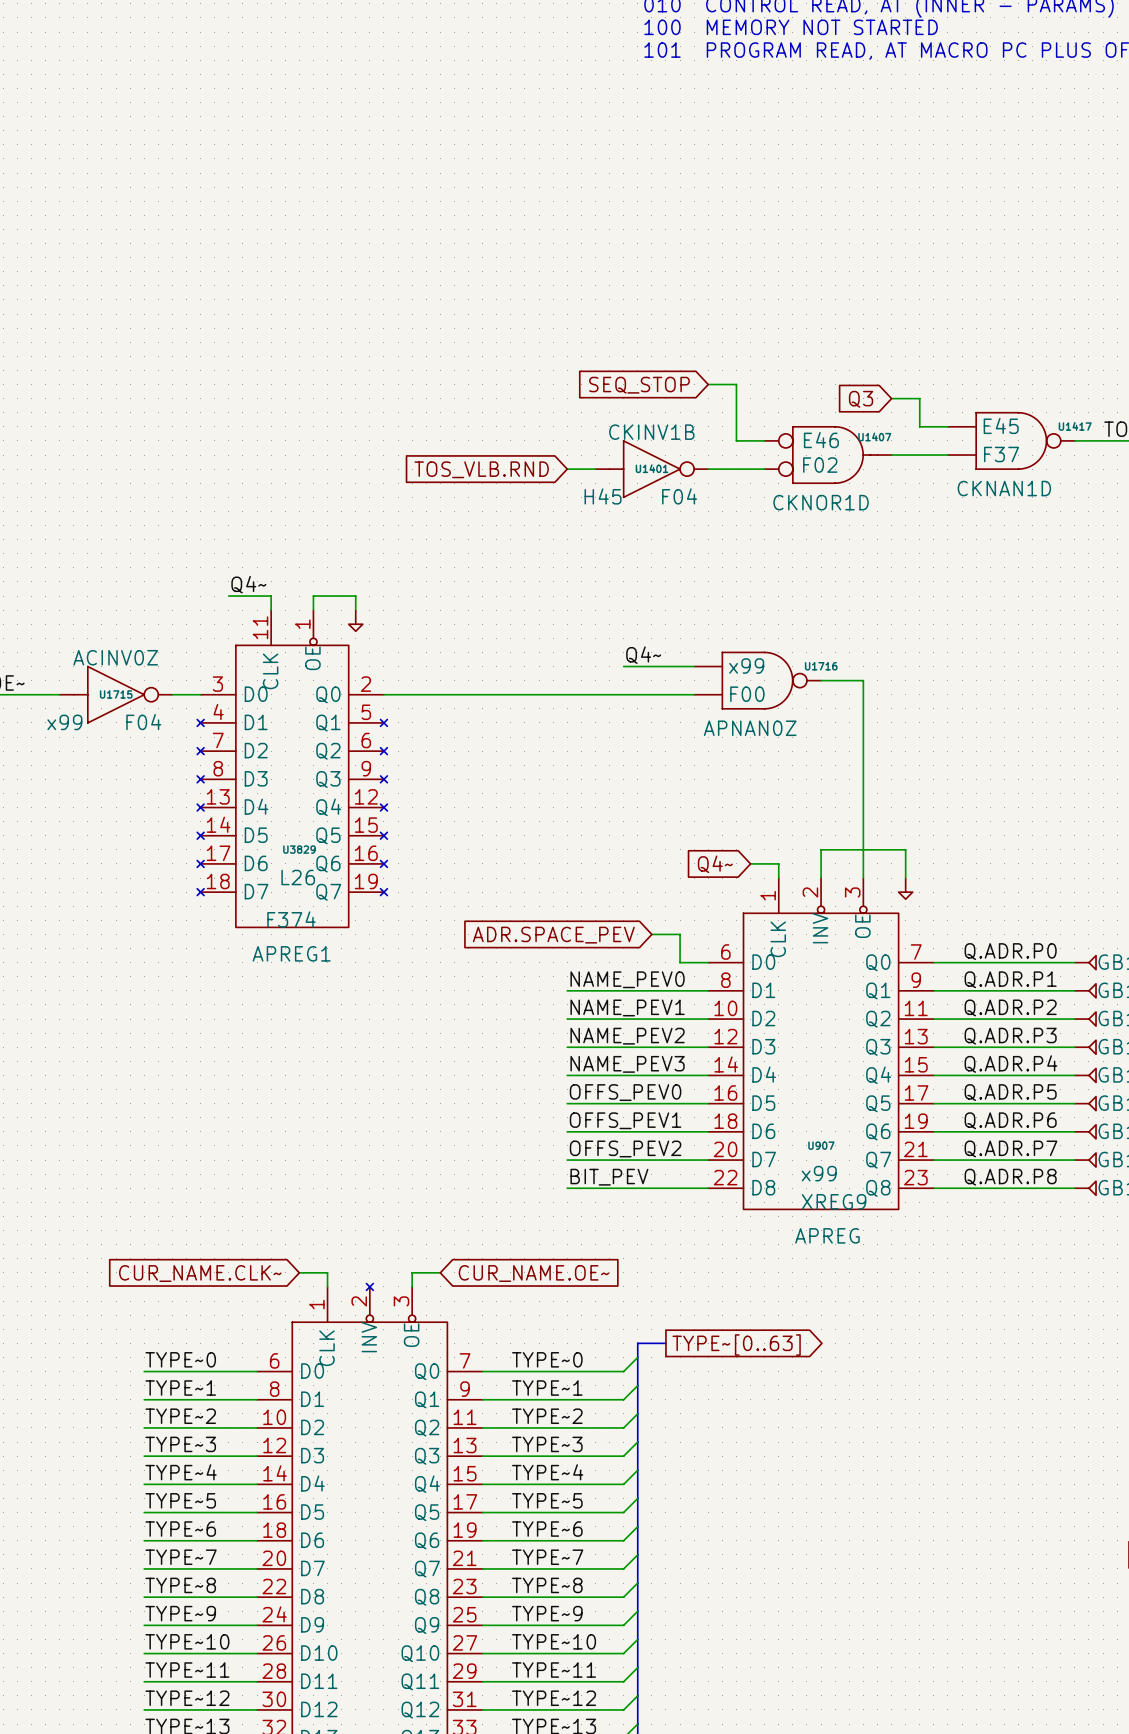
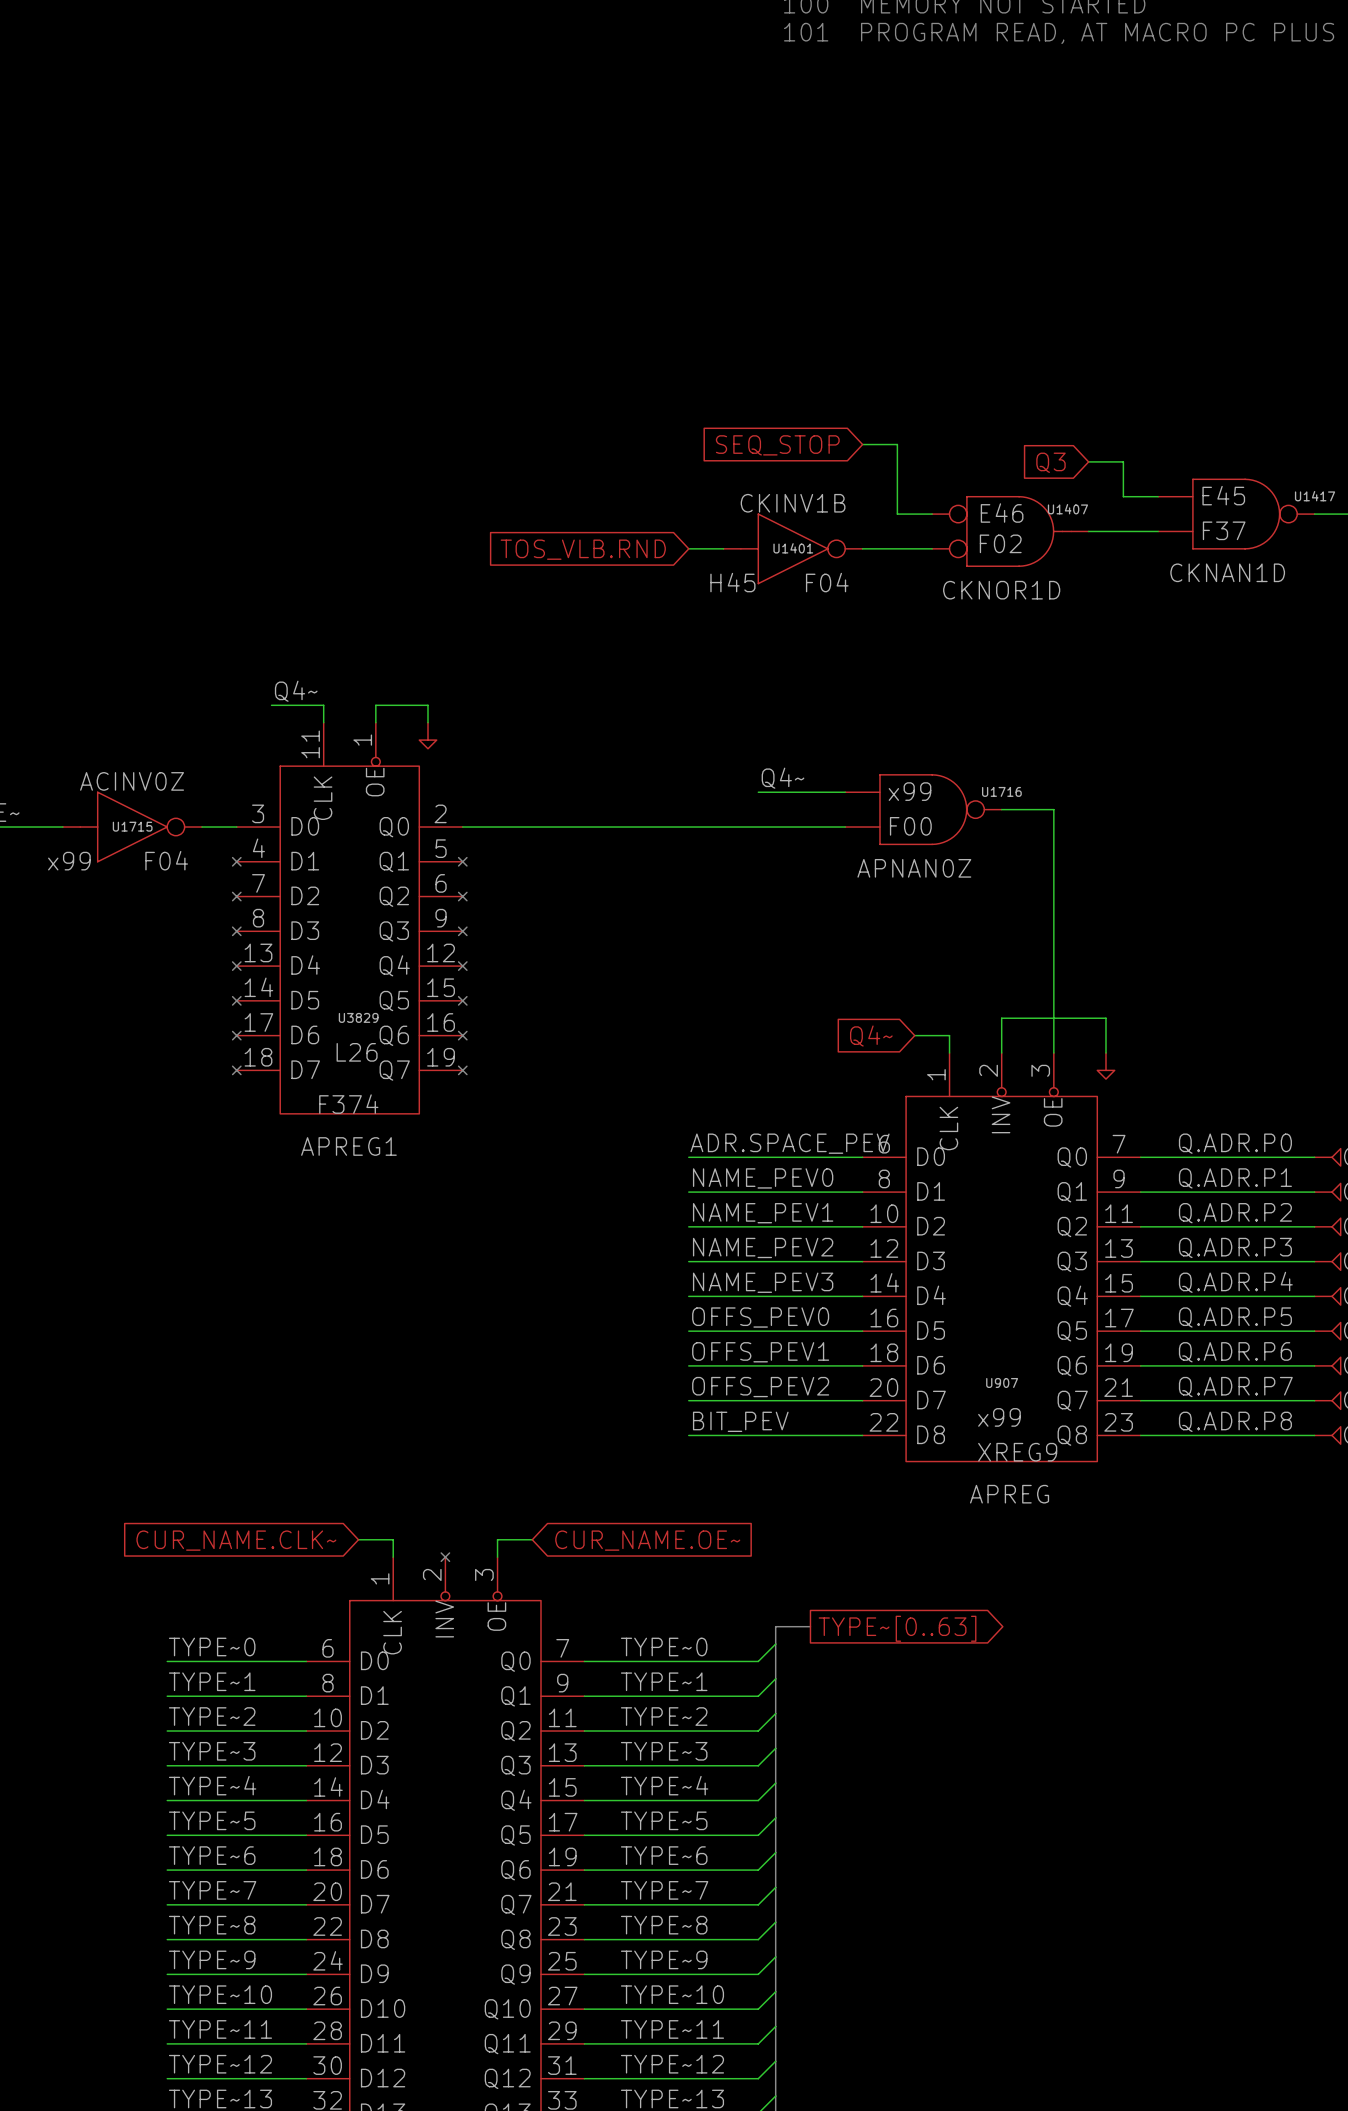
wire: (651, 934) (680, 934) (680, 962) -> (688, 1157) (827, 1157)
global label: ADR.SPACE_PEV (553, 935) -> none
label: none -> ADR.SPACE_PEV (790, 1143)

